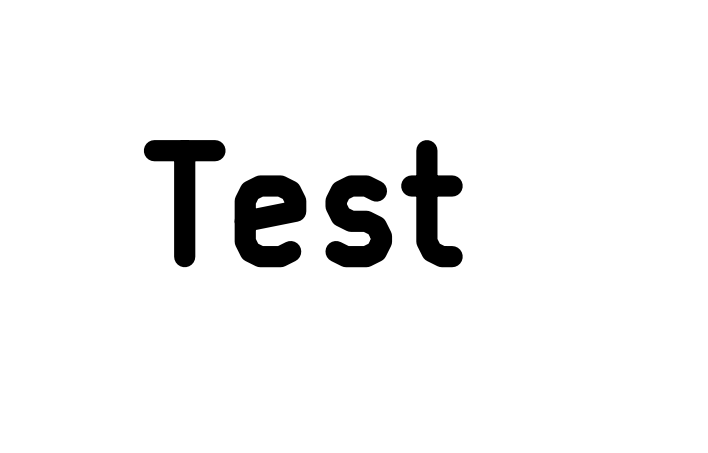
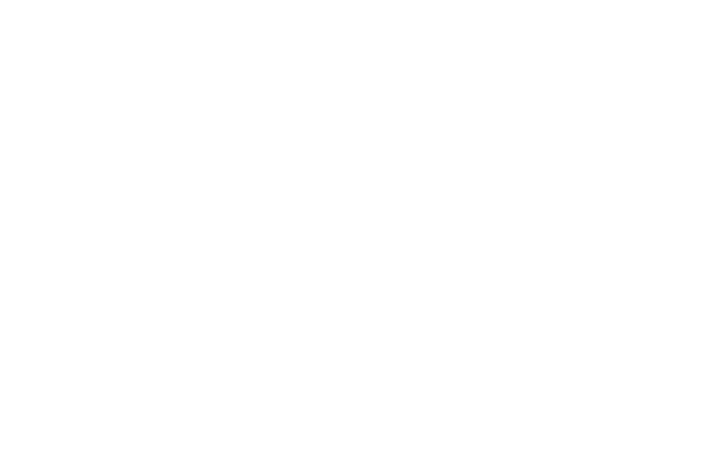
text: Test (303, 203) -> none

